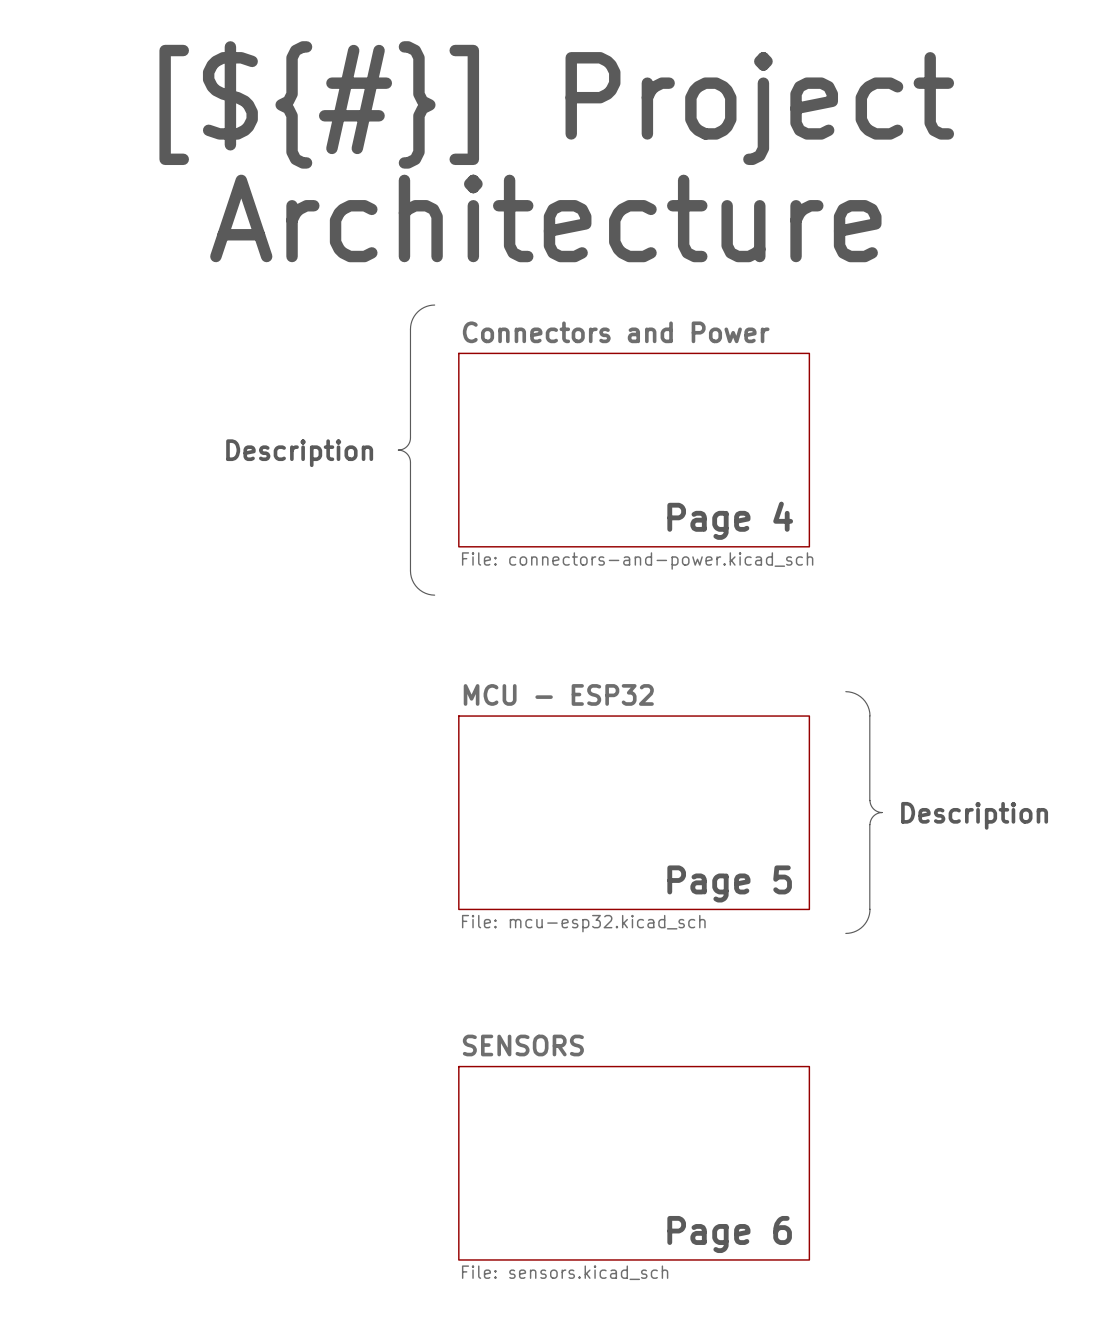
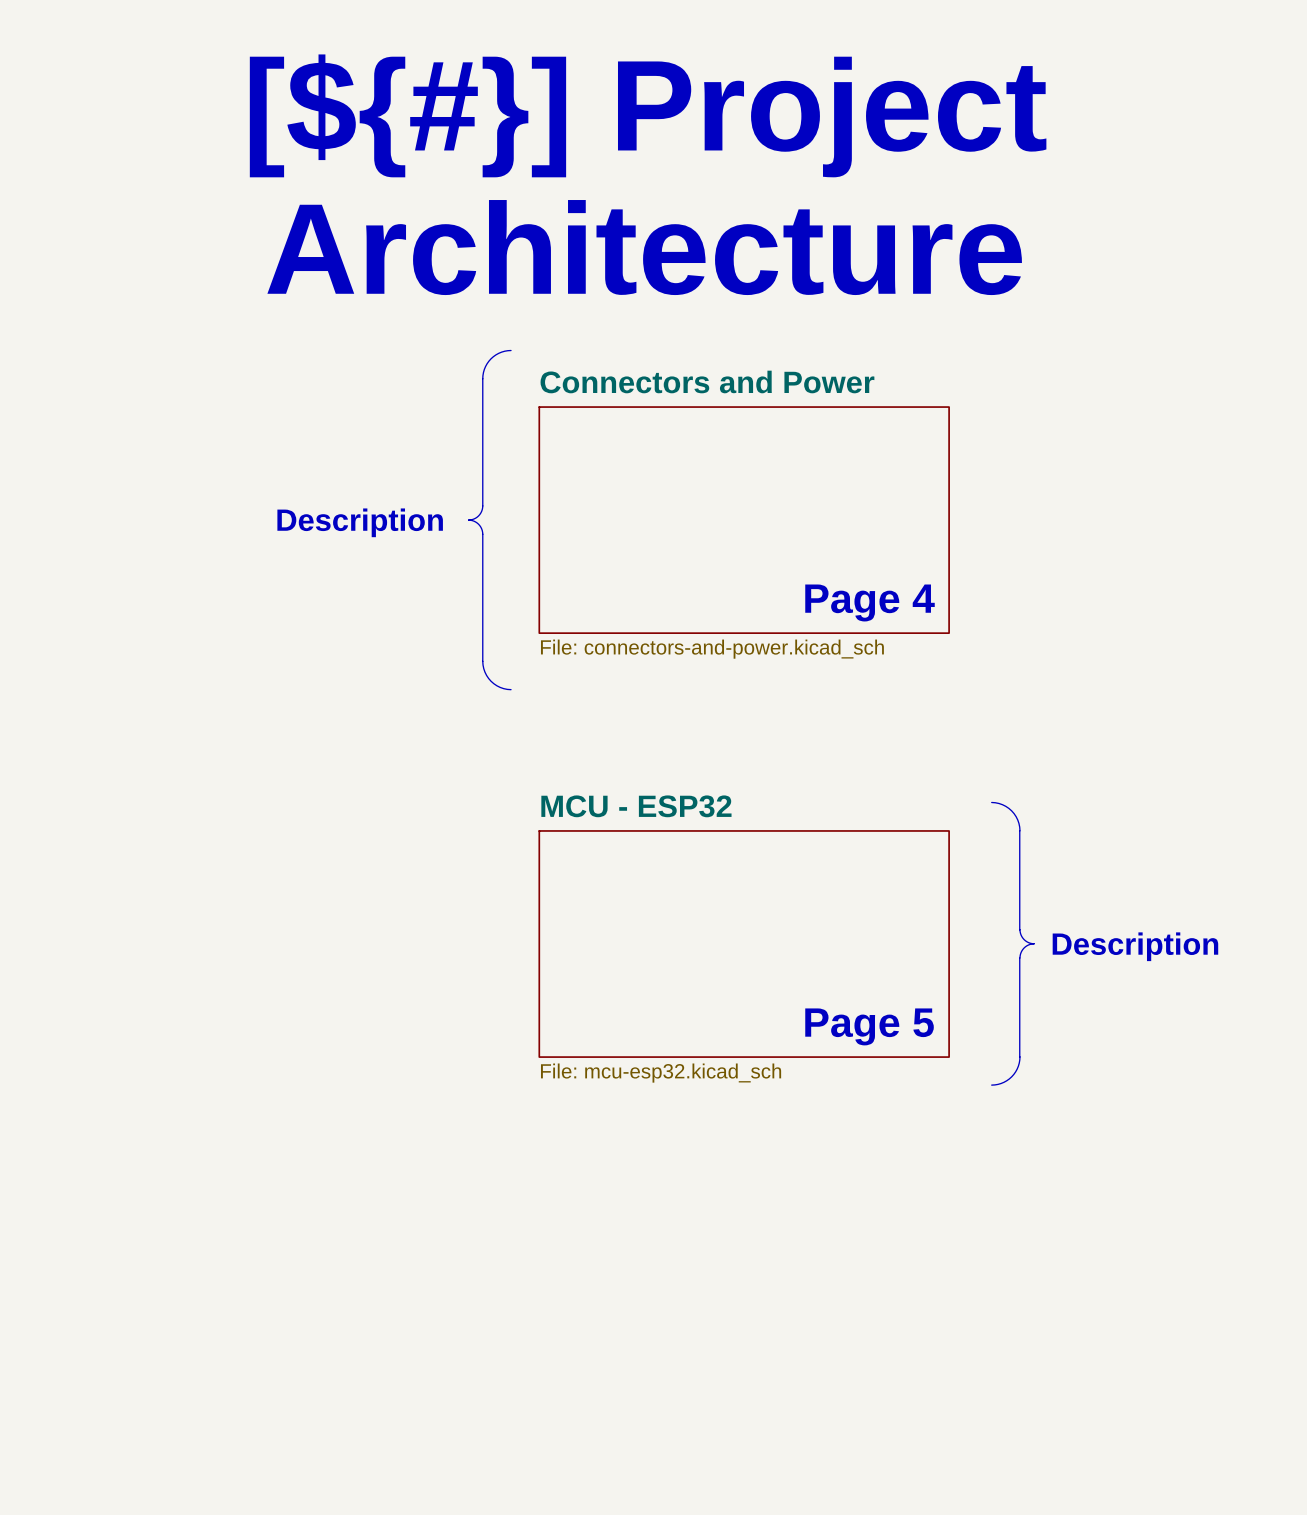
sheet SENSORS: File: sensors.kicad_sch (634, 1163) -> none
text: Page 6 (729, 1234) -> none

